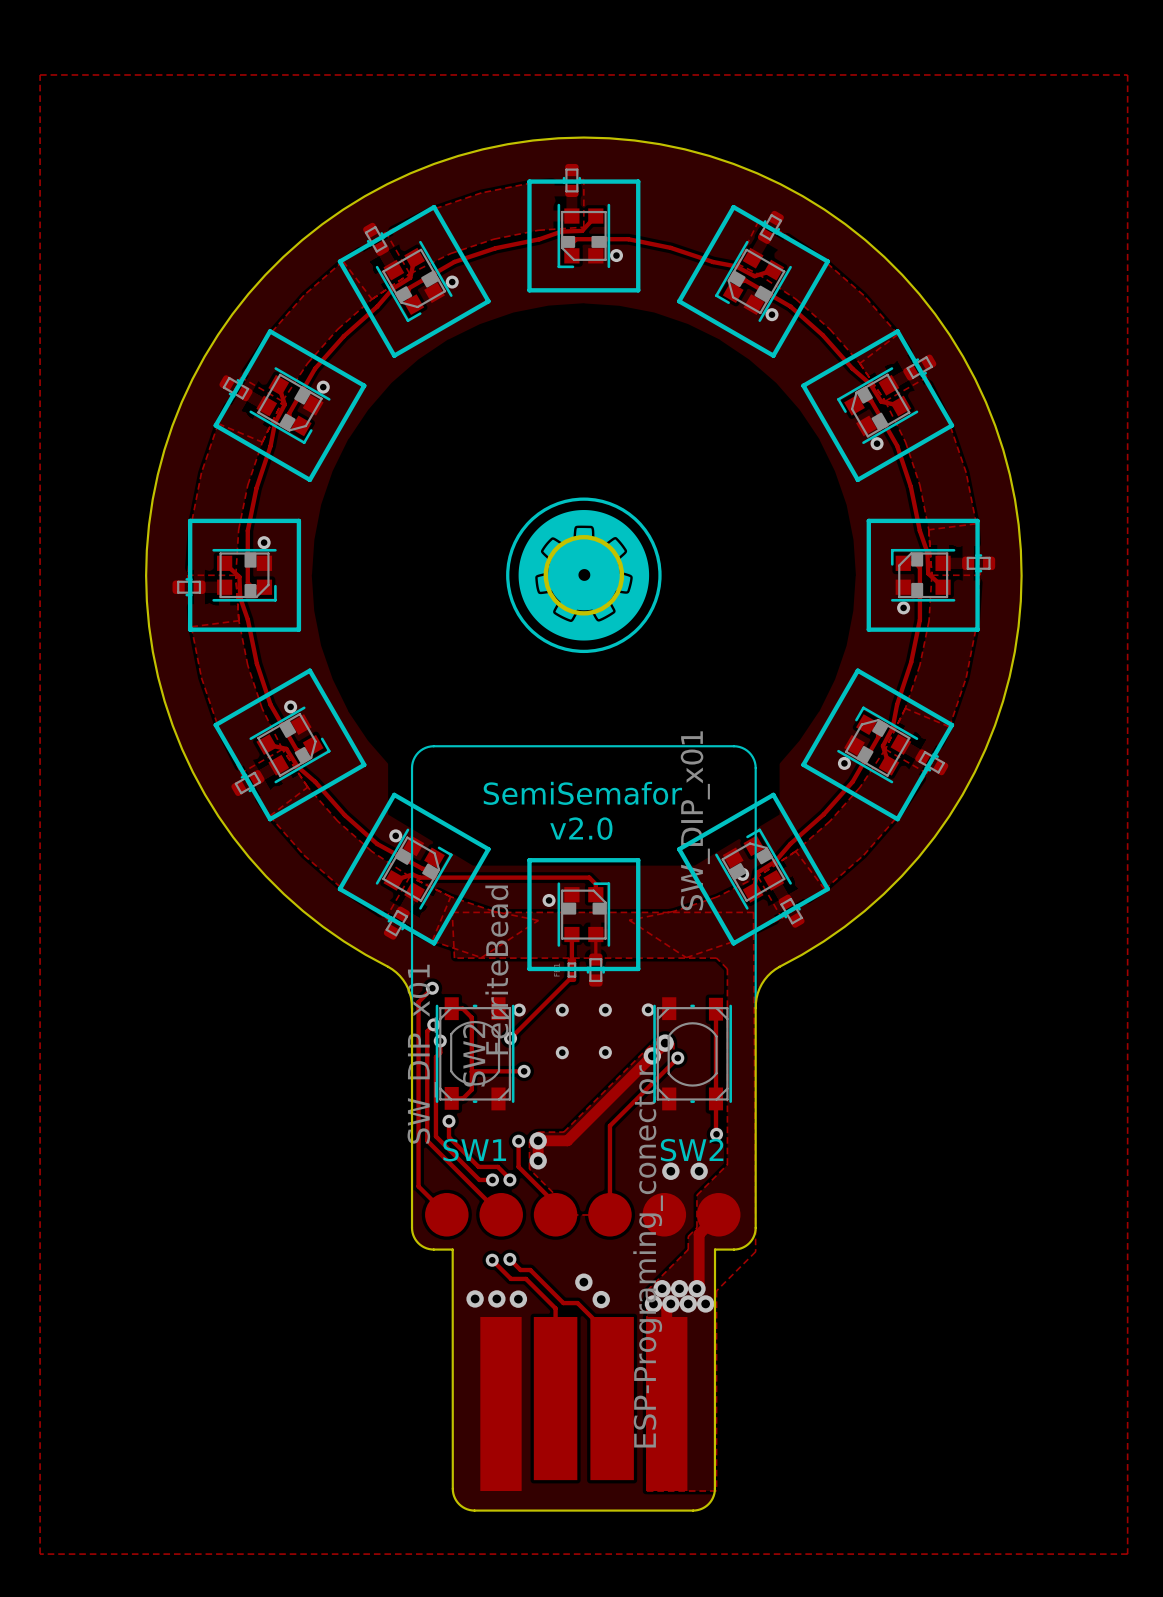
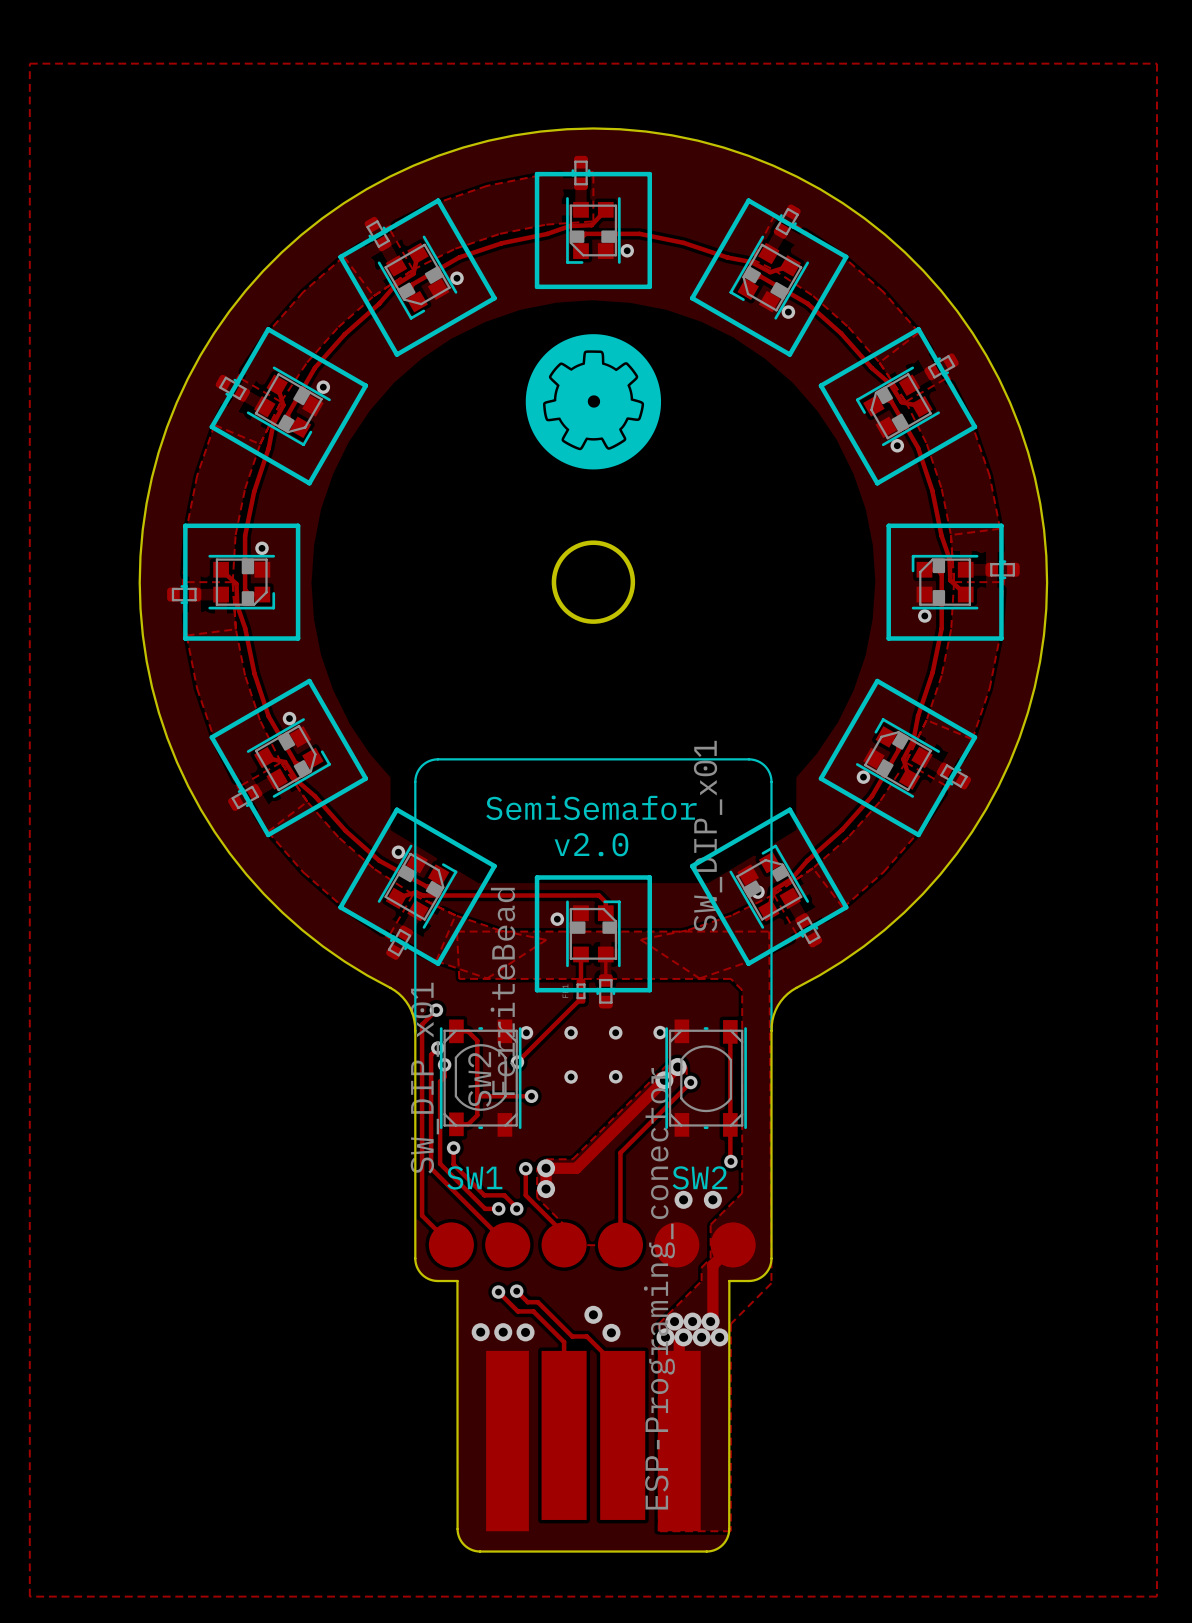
drawing: [506, 497, 662, 654] -> none
drawing position: (583, 575) -> (593, 401)

